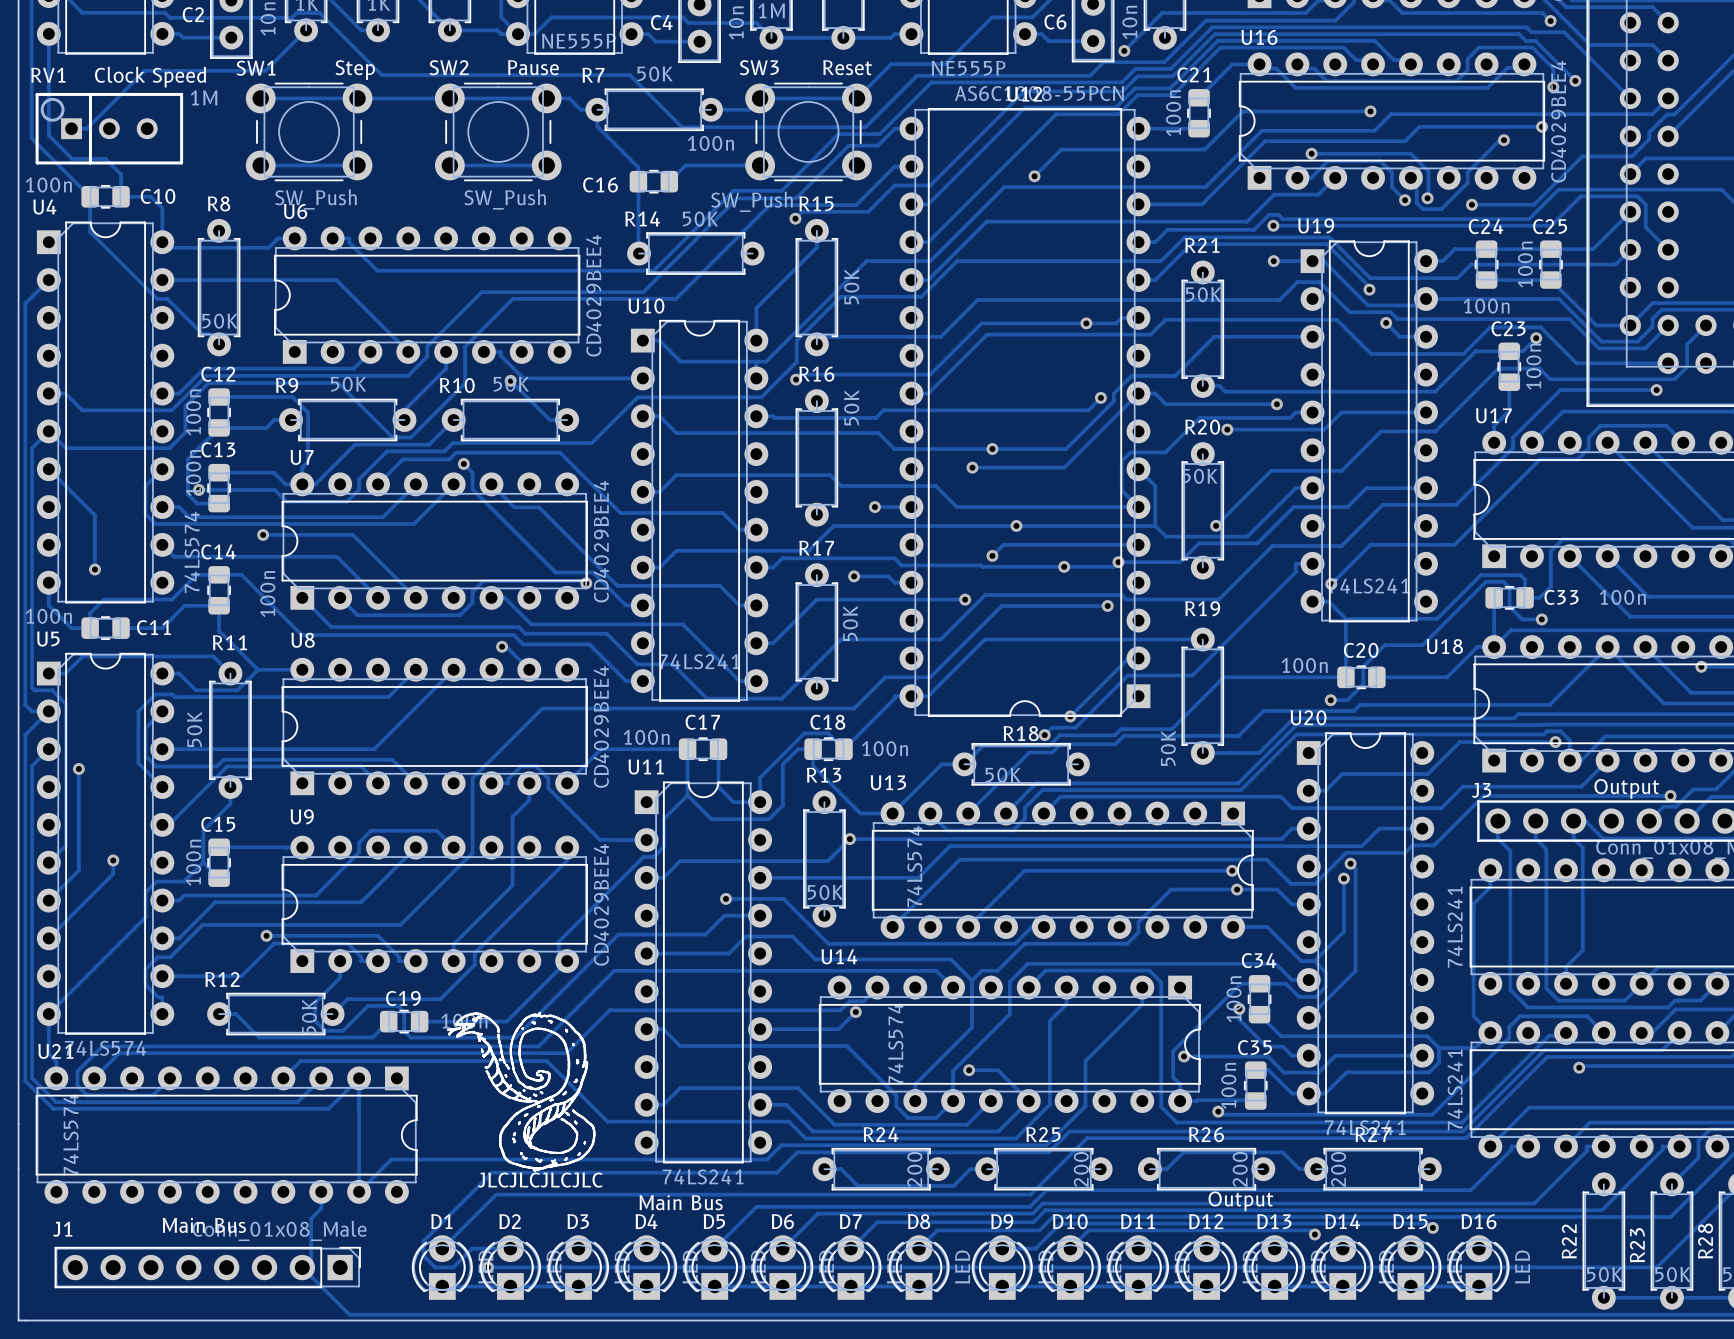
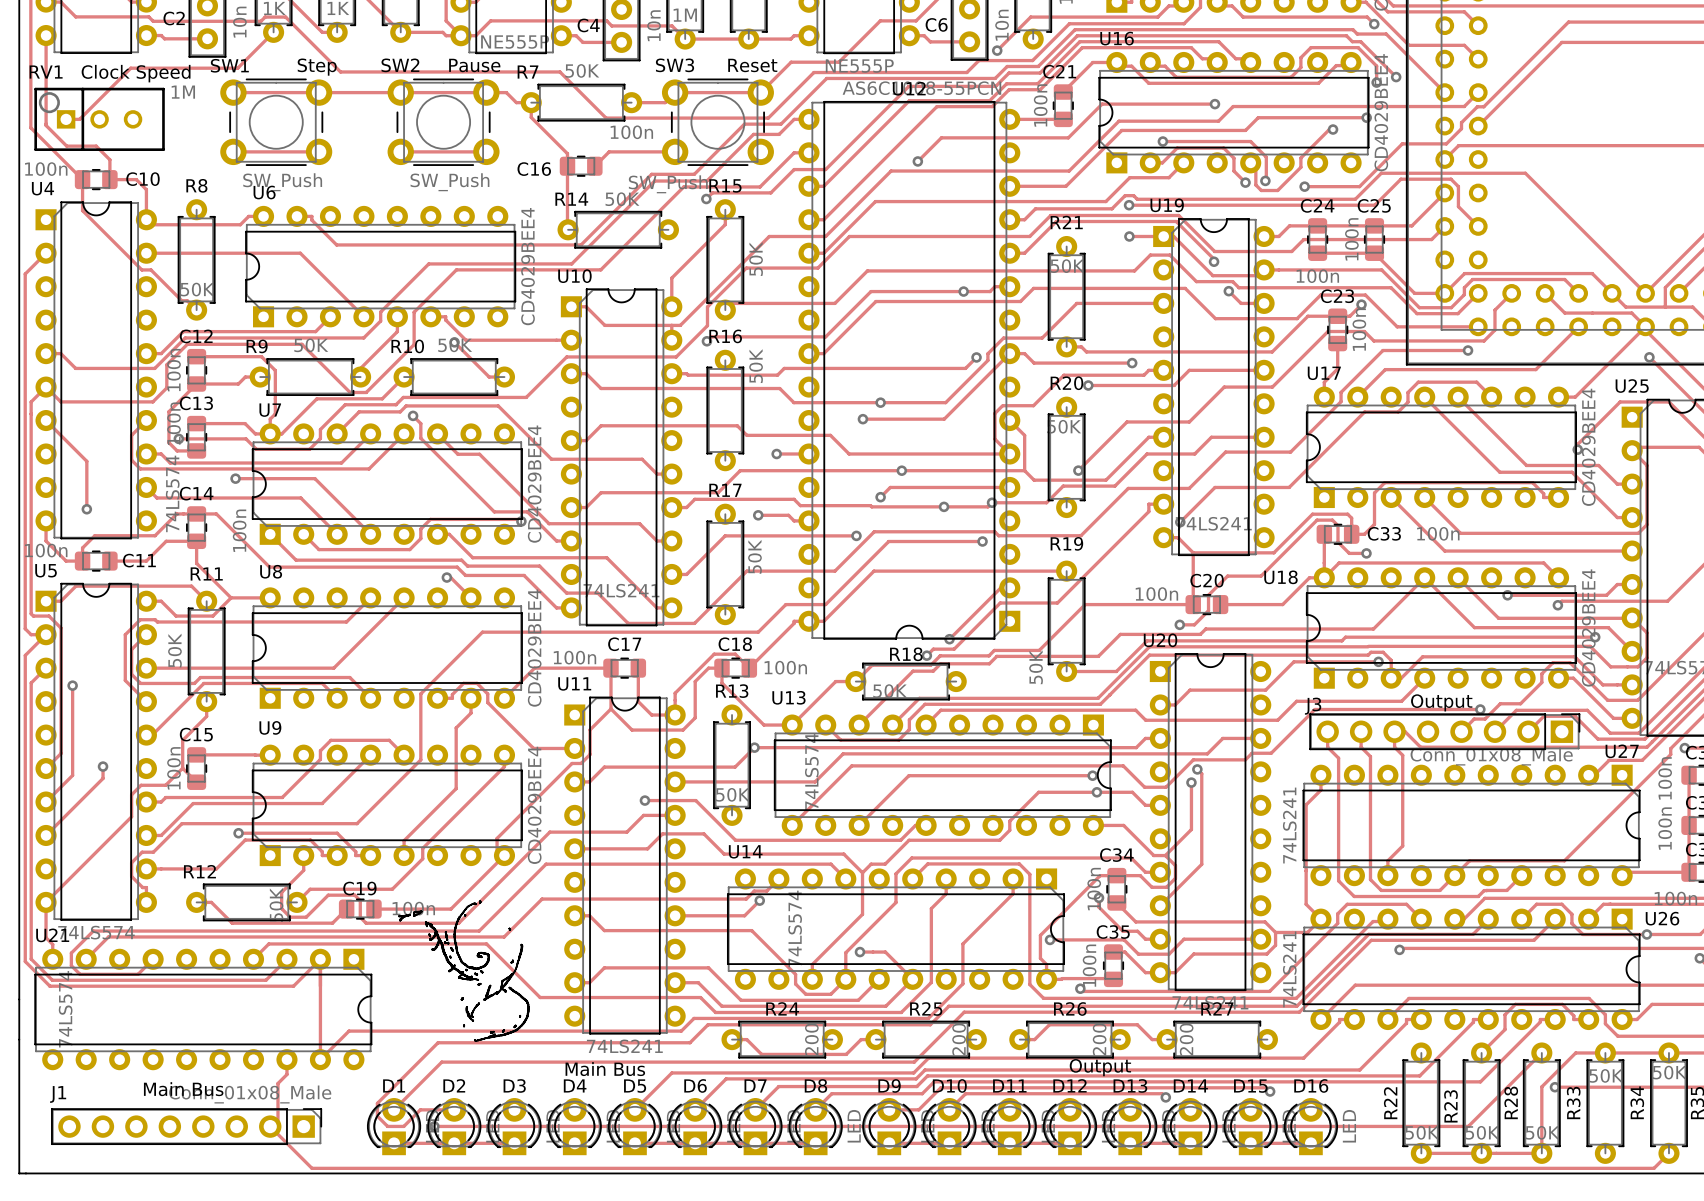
line: (534, 1016) (556, 1017) (566, 1022) (578, 1034) (584, 1045) (583, 1066) (585, 1056) (583, 1041) (579, 1034) (565, 1020) (550, 1015) (533, 1014) (525, 1018) (516, 1030) -> none
line: (549, 1020) (549, 1021) (551, 1022) (549, 1020) -> none
line: (532, 1022) (535, 1023) (532, 1022) -> none
line: (463, 1024) (456, 1024) (456, 1024) (458, 1020) (466, 1015) (473, 1013) (479, 1013) (487, 1016) (492, 1021) (497, 1026) (498, 1031) (492, 1021) (482, 1015) (473, 1020) (473, 1019) (481, 1015) (475, 1013) (465, 1016) (458, 1021) (457, 1024) (474, 1024) (458, 1035) (465, 1033) (472, 1031) (481, 1034) (470, 1032) (456, 1036) (462, 1030) (464, 1024) -> none
line: (566, 1029) (566, 1031) (566, 1029) -> none
line: (499, 1040) (498, 1034) (499, 1040) -> none
line: (577, 1059) (577, 1059) (577, 1060) (577, 1060) (577, 1062) (577, 1063) (578, 1061) (577, 1059) -> none
line: (583, 1076) (580, 1087) (573, 1096) (565, 1102) (555, 1104) (535, 1115) (532, 1117) (526, 1124) (525, 1128) (524, 1131) (527, 1124) (535, 1115) (555, 1104) (564, 1102) (561, 1112) (553, 1118) -> none
line: (502, 1079) (496, 1086) (502, 1081) -> none
line: (565, 1091) (566, 1092) (565, 1093) (563, 1094) (565, 1091) -> none
line: (518, 1094) (514, 1098) (500, 1092) (490, 1078) (493, 1078) (496, 1074) (497, 1069) (491, 1078) (486, 1071) (493, 1084) (501, 1093) (519, 1100) (537, 1101) -> none
line: (552, 1099) (550, 1100) (552, 1099) -> none
line: (557, 1106) (553, 1117) (557, 1112) (557, 1106) -> none
line: (527, 1113) (524, 1115) (527, 1113) -> none
line: (541, 1114) (538, 1126) (541, 1114) -> none
line: (575, 1121) (575, 1123) (576, 1123) (575, 1122) (575, 1121) -> none
line: (529, 1127) (527, 1134) (527, 1137) (529, 1127) -> none
line: (538, 1127) (547, 1121) (537, 1128) (529, 1138) (530, 1145) (538, 1149) (551, 1152) (562, 1153) (568, 1150) (571, 1148) (573, 1146) (576, 1142) (577, 1135) (576, 1131) (570, 1124) (563, 1119) (561, 1119) (570, 1125) (576, 1133) (575, 1142) (570, 1148) (560, 1152) (550, 1152) (538, 1149) (530, 1143) -> none
line: (532, 1130) (535, 1118) (533, 1130) -> none
line: (514, 1133) (514, 1135) (514, 1133) -> none
line: (513, 1138) (514, 1142) (513, 1138) -> none
line: (526, 1157) (524, 1159) (522, 1156) (526, 1157) -> none
line: (541, 1160) (540, 1161) (539, 1161) (536, 1158) (540, 1160) -> none
line: (555, 1163) (540, 1168) (513, 1163) (505, 1157) (500, 1144) (502, 1131) (513, 1117) (524, 1108) (557, 1094) (564, 1087) (568, 1077) (569, 1058) (564, 1041) (558, 1035) (553, 1032) (545, 1029) (535, 1028) (529, 1030) (524, 1033) (522, 1035) (520, 1042) (519, 1050) (519, 1057) (521, 1065) (525, 1075) (528, 1077) (535, 1080) (540, 1080) (542, 1078) (541, 1077) (541, 1080) (536, 1080) (526, 1075) (519, 1053) (524, 1034) (532, 1029) (540, 1028) (556, 1034) (564, 1043) (568, 1062) (566, 1079) (556, 1094) (525, 1108) (514, 1115) (502, 1129) (499, 1140) (500, 1148) (504, 1157) (507, 1160) (511, 1163) (522, 1166) (538, 1169) (536, 1170) -> none
text: JLCJLCJLCJLC (540, 1180) -> none

